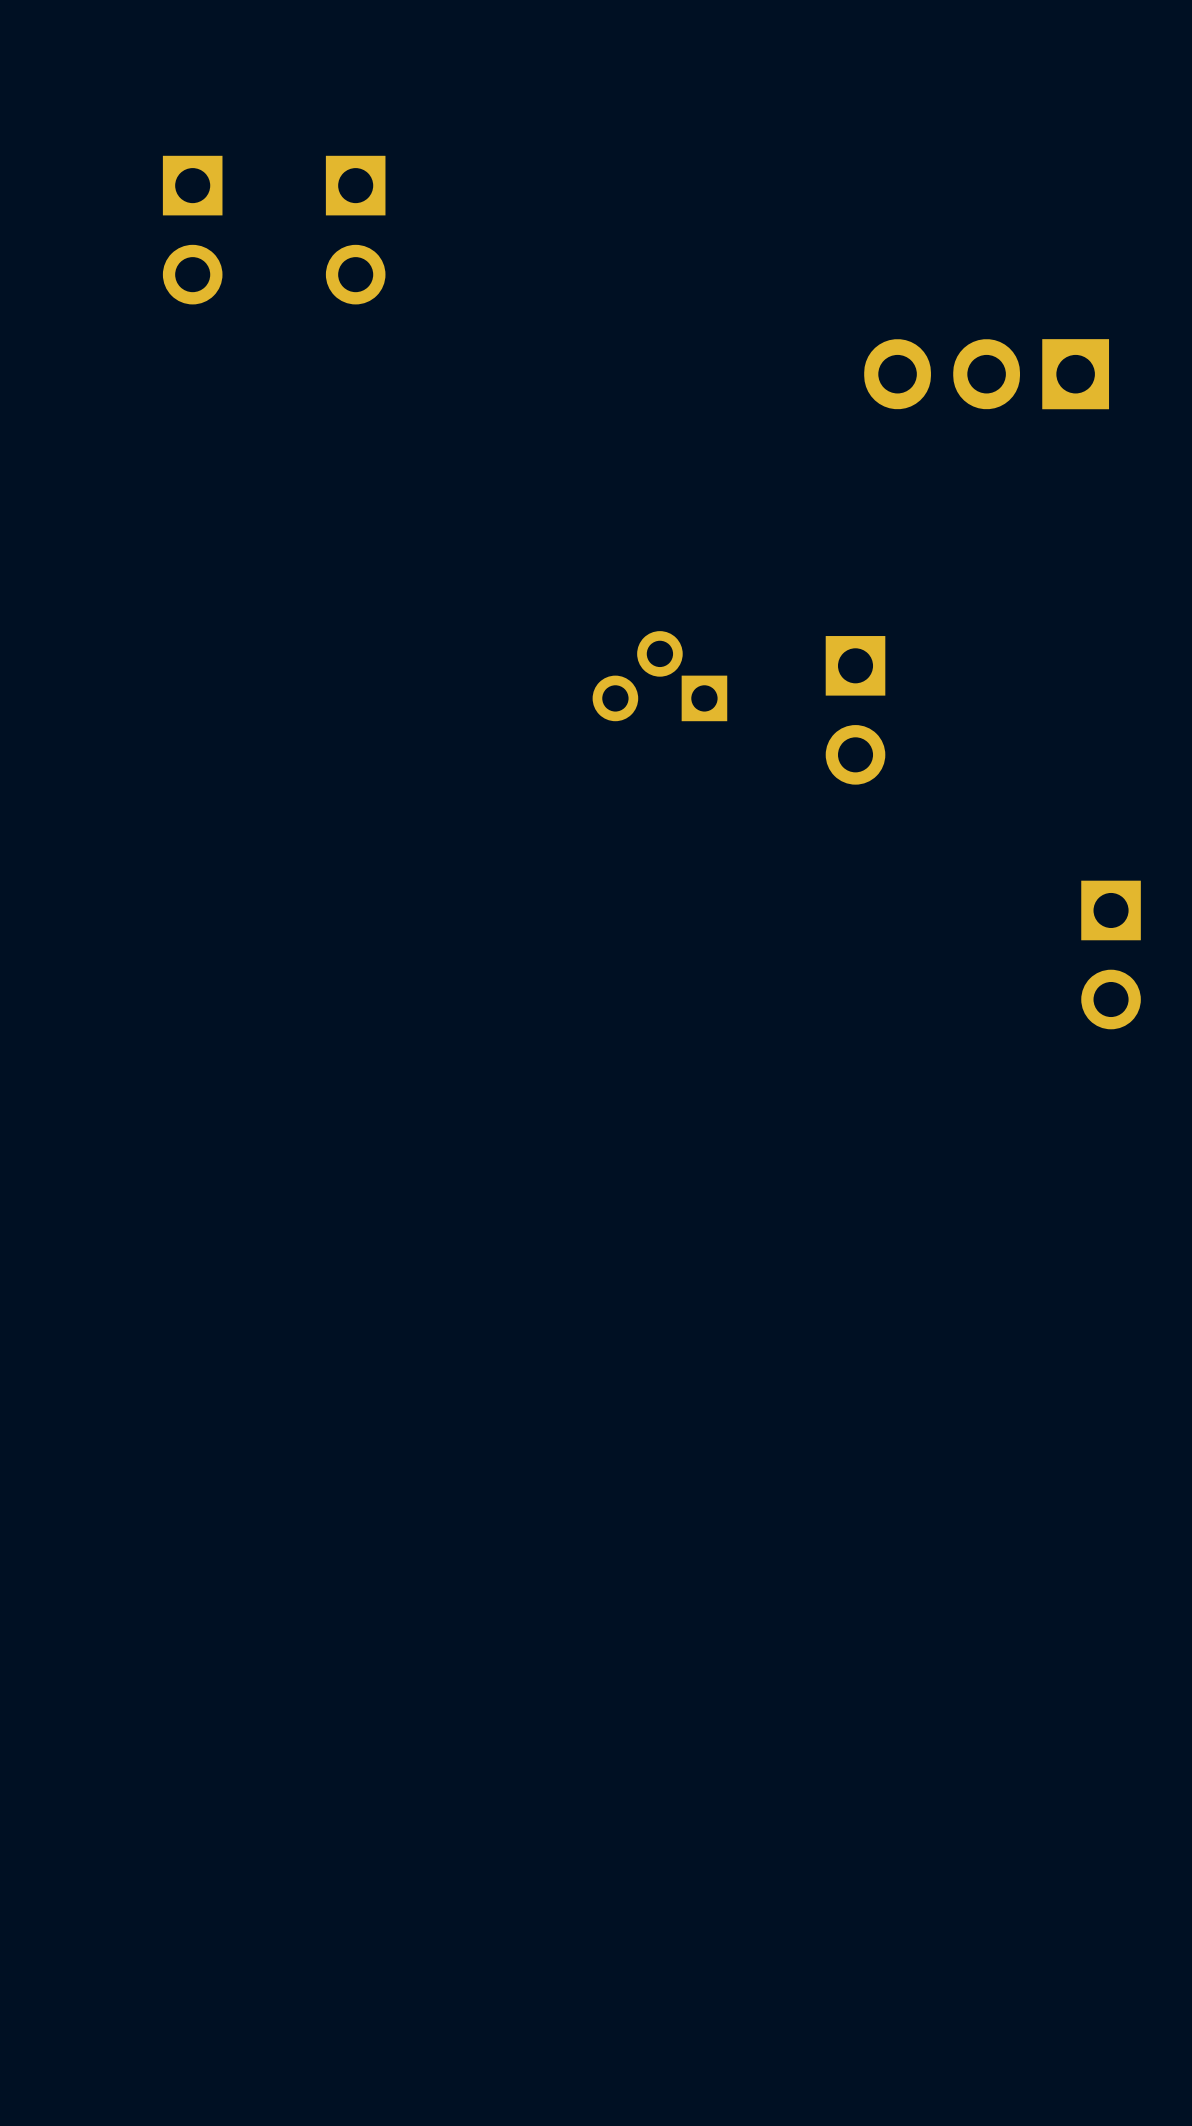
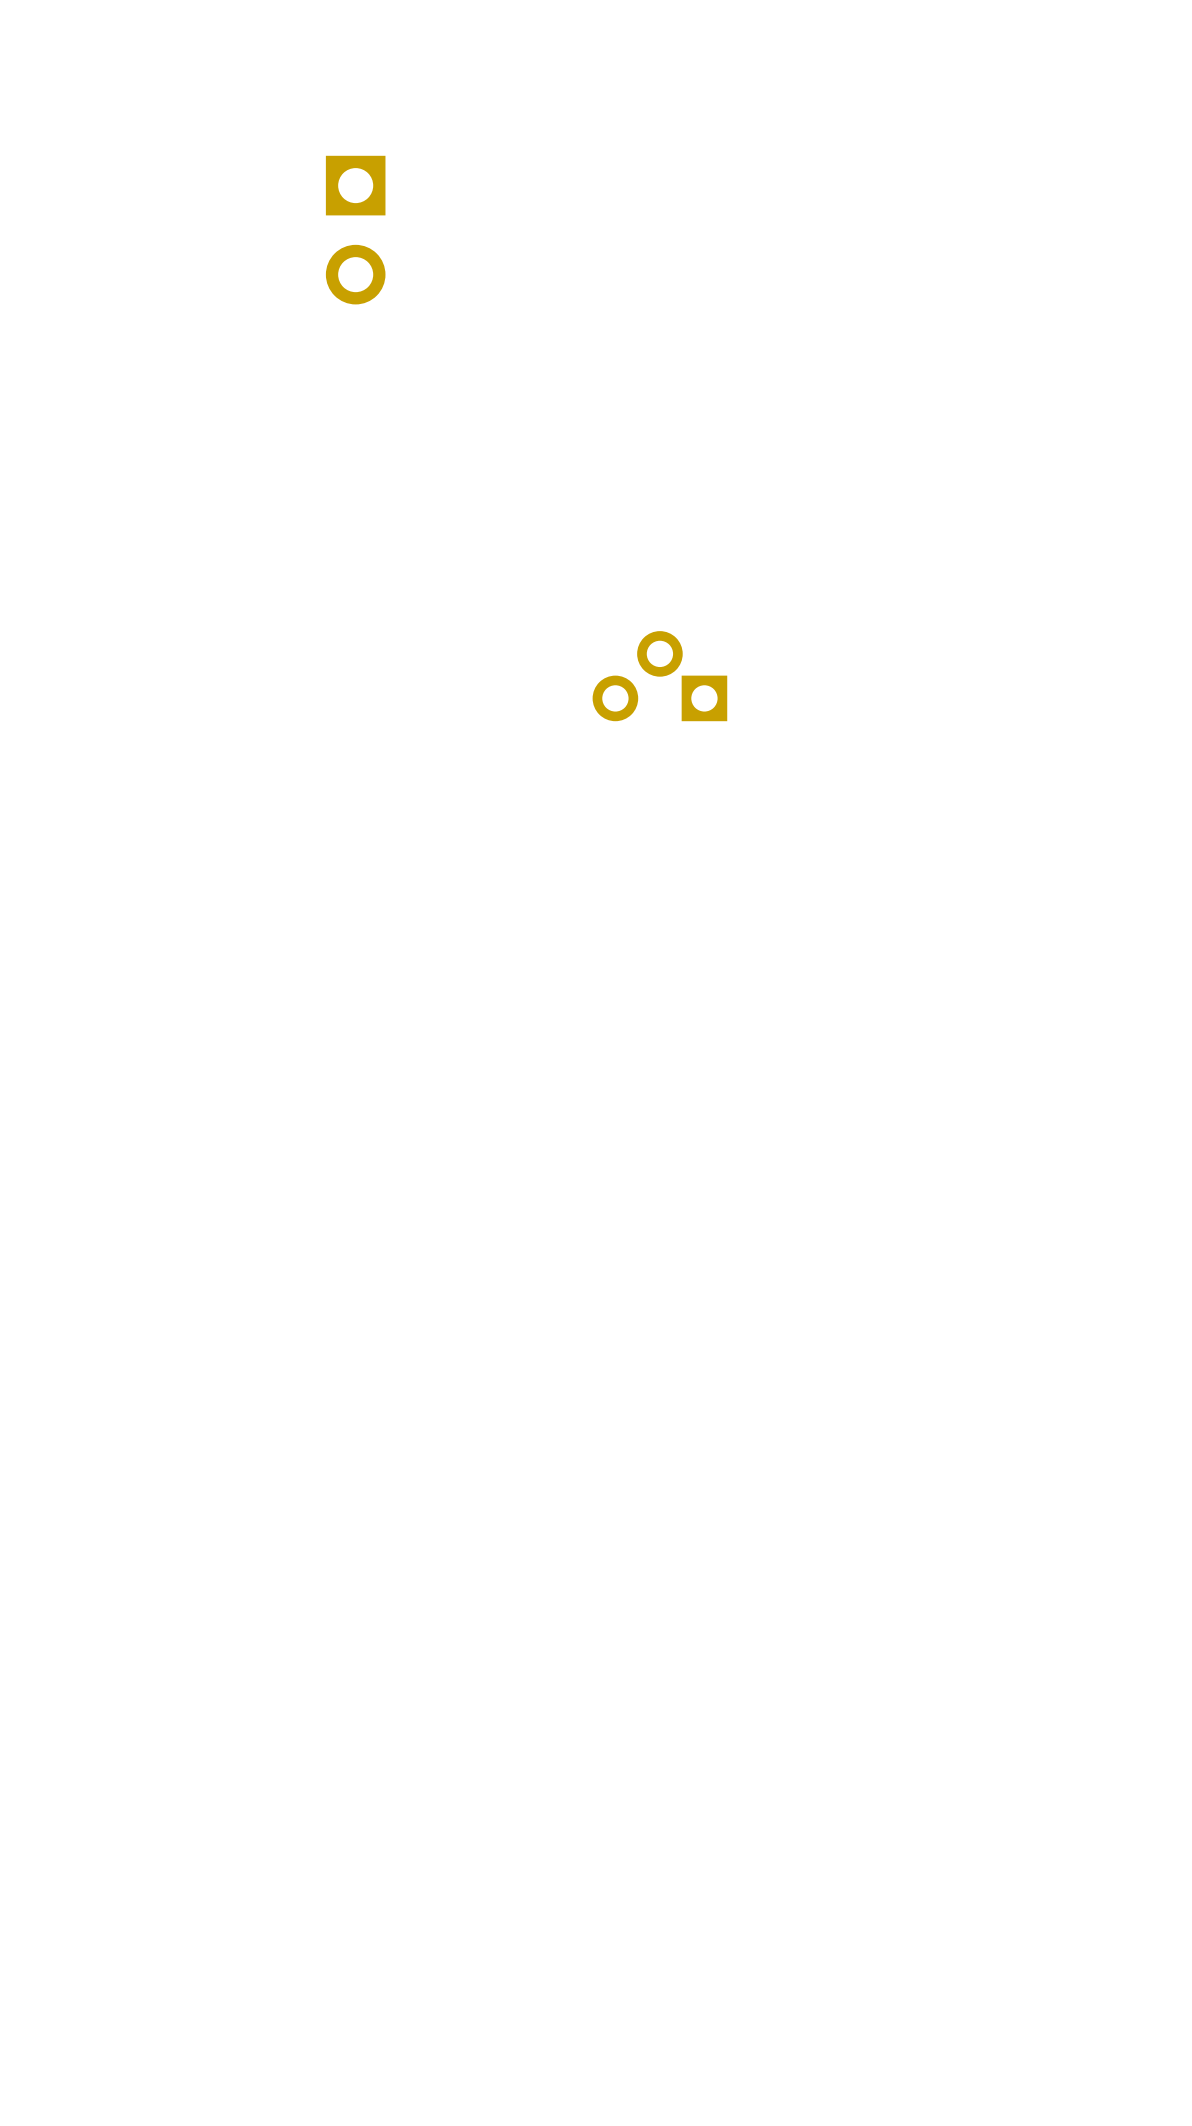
part: (192, 230) -> none
part: (986, 374) -> none
part: (855, 710) -> none
part: (1111, 954) -> none

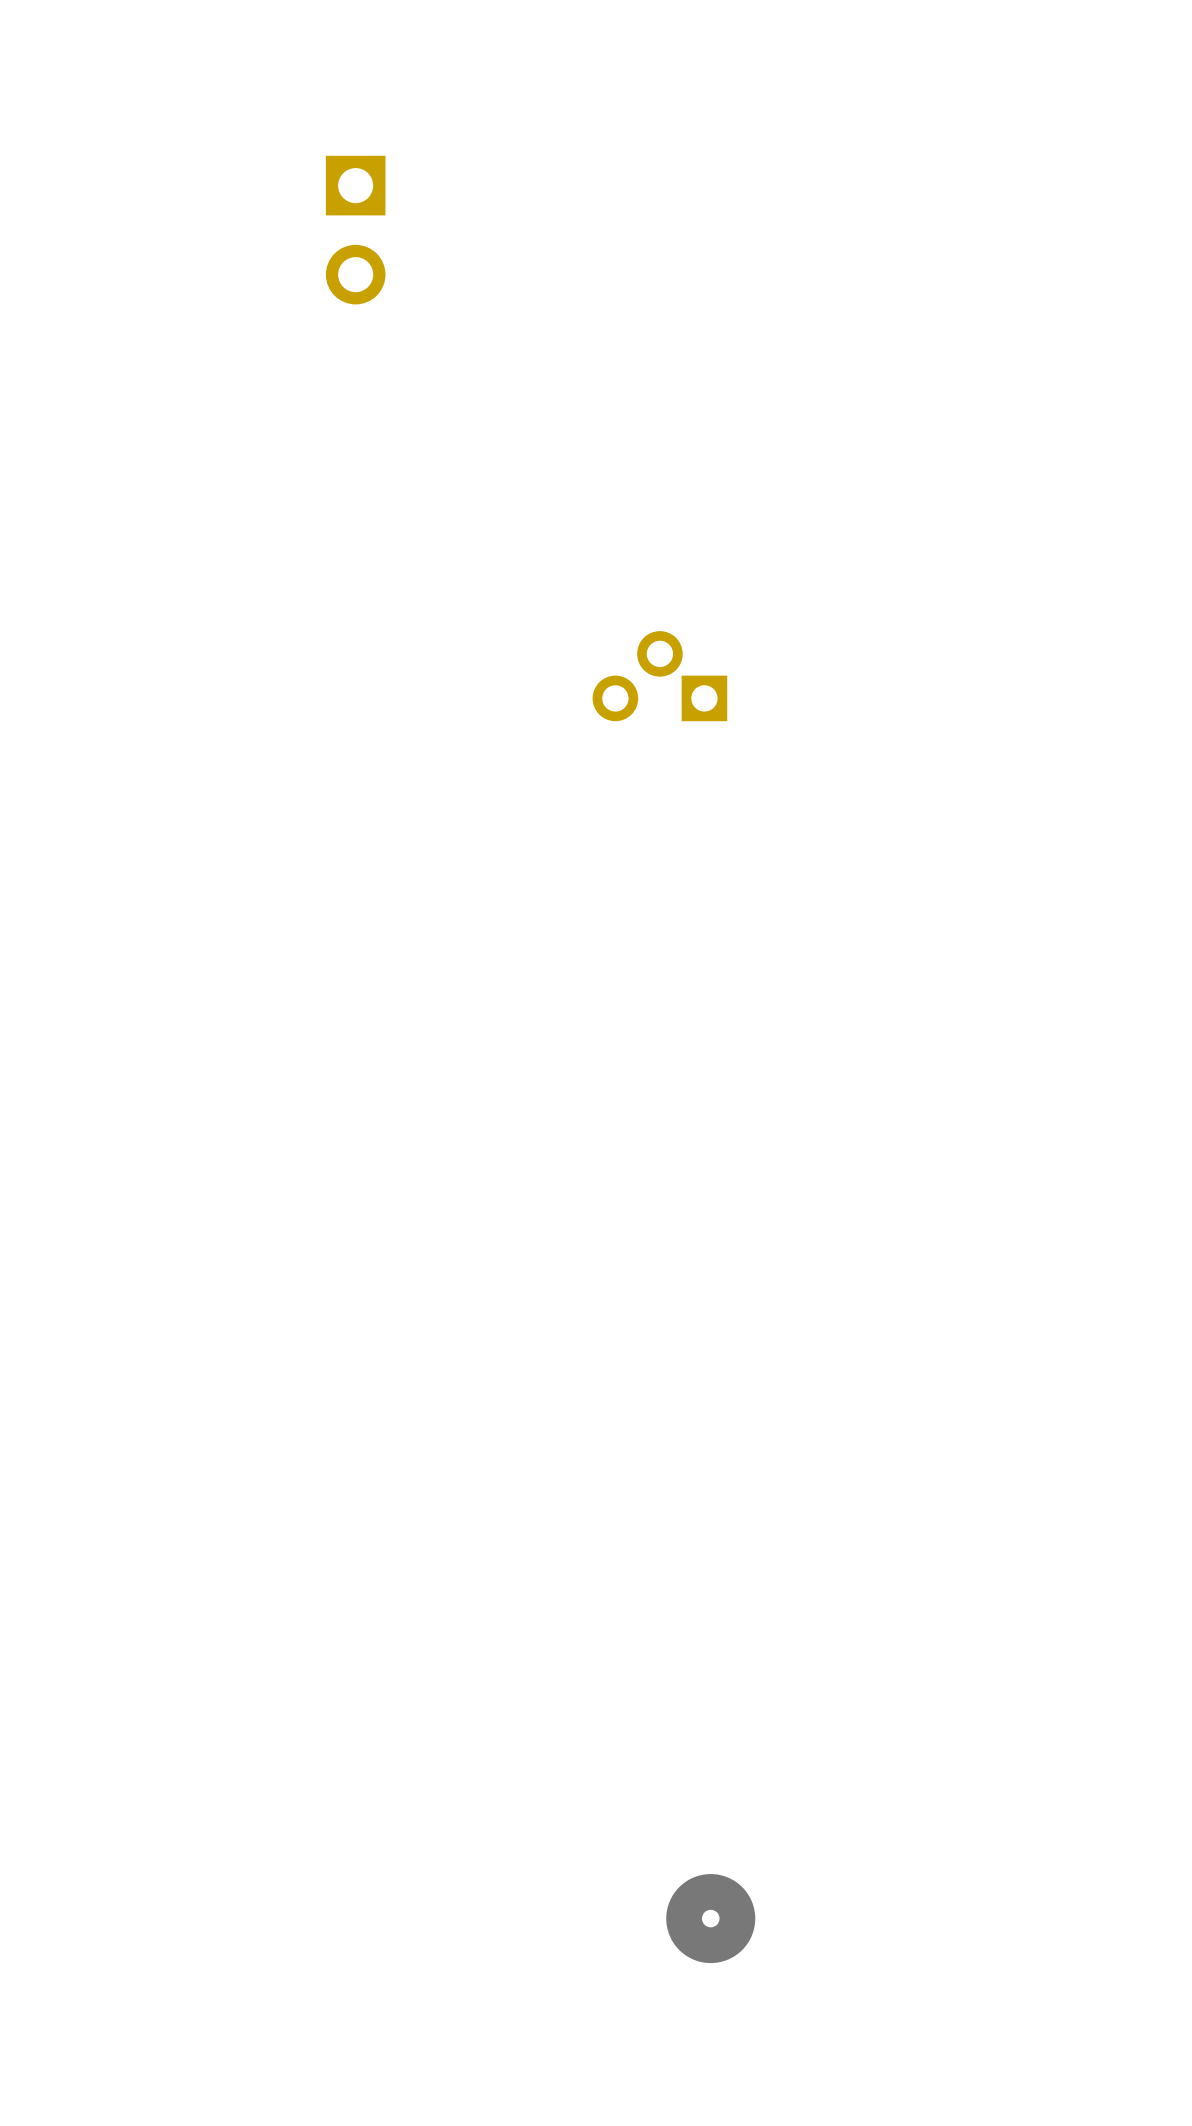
via: none -> (710, 1918)

